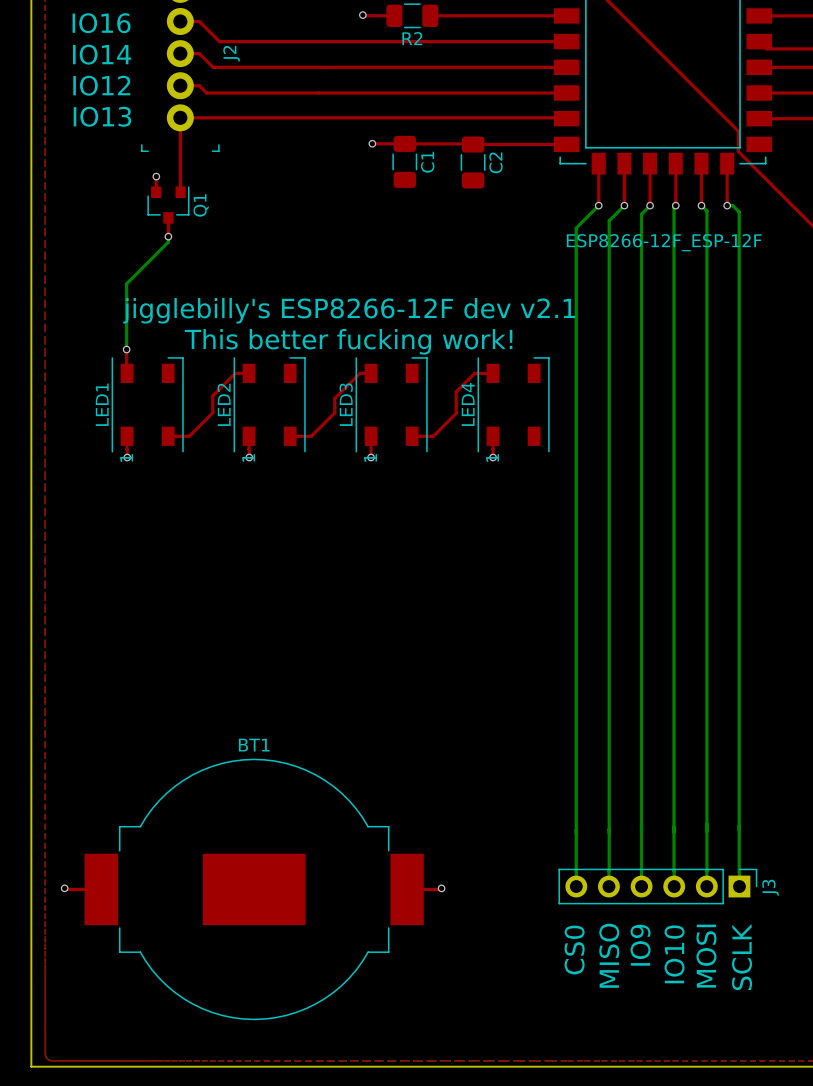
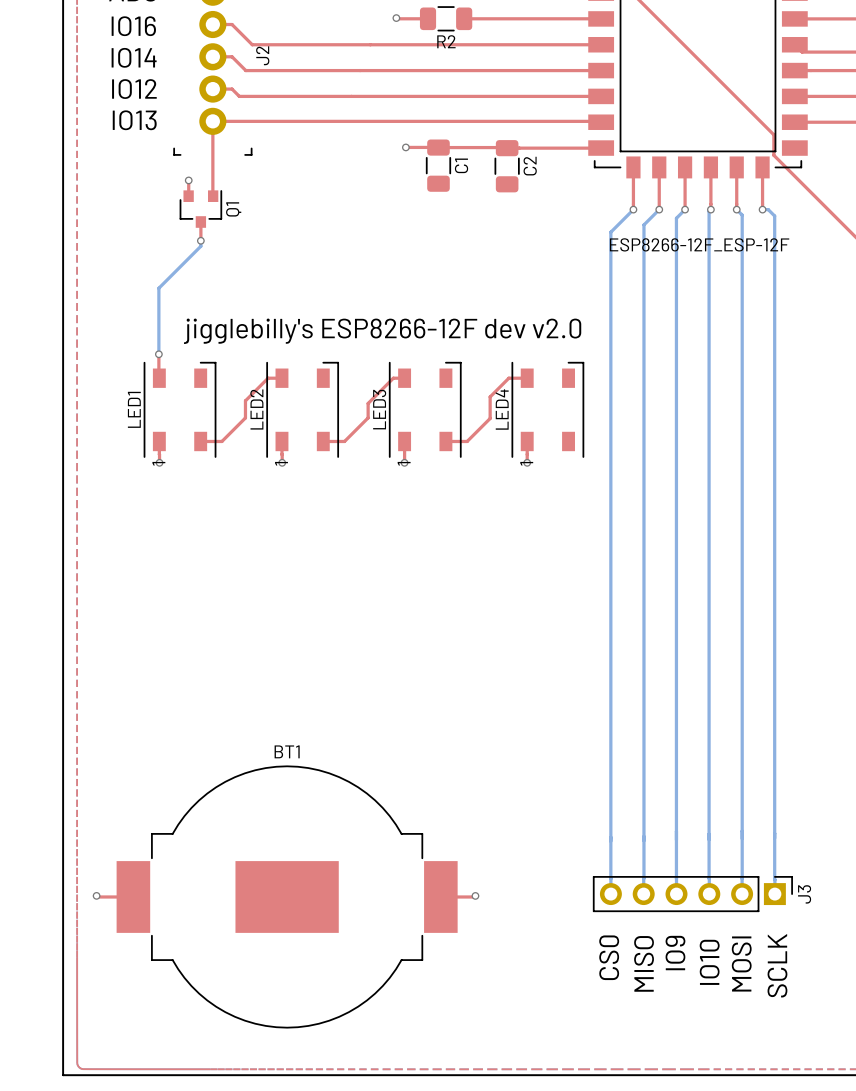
text: jigglebilly's ESP8266-12F dev v2.1 (349, 310) -> jigglebilly's ESP8266-12F dev v2.0 (382, 331)
text: This better fucking work! (348, 341) -> none

